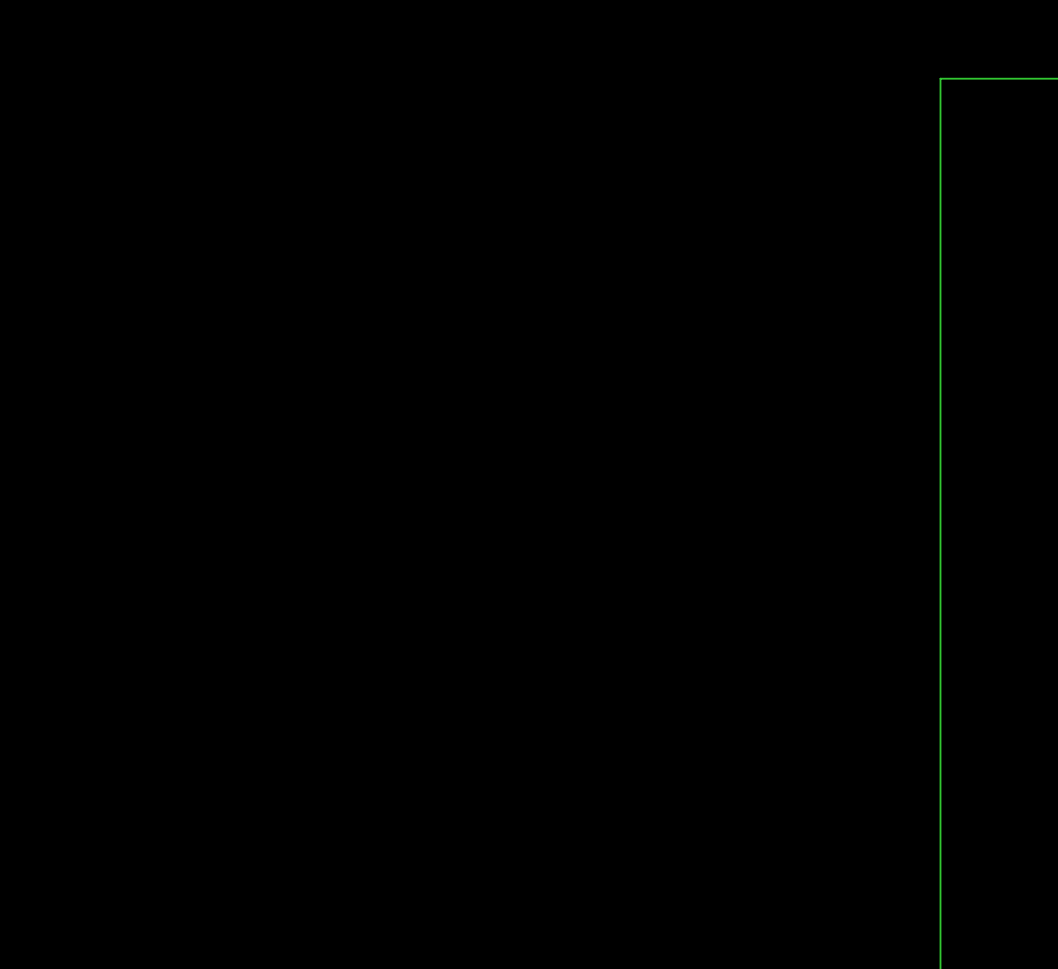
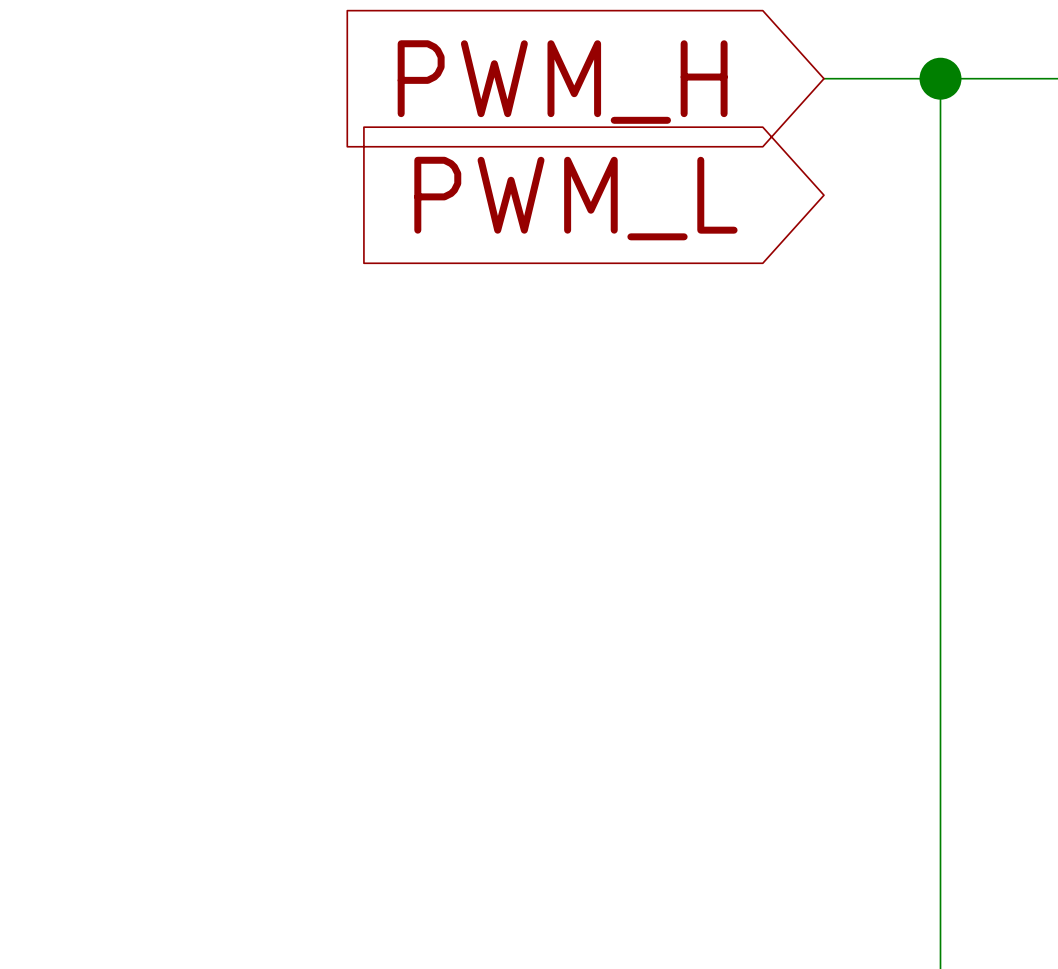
wire: none -> (823, 78) (940, 78)
junction: none -> (940, 78)
global label: none -> PWM_H (562, 82)
global label: none -> PWM_L (575, 198)

